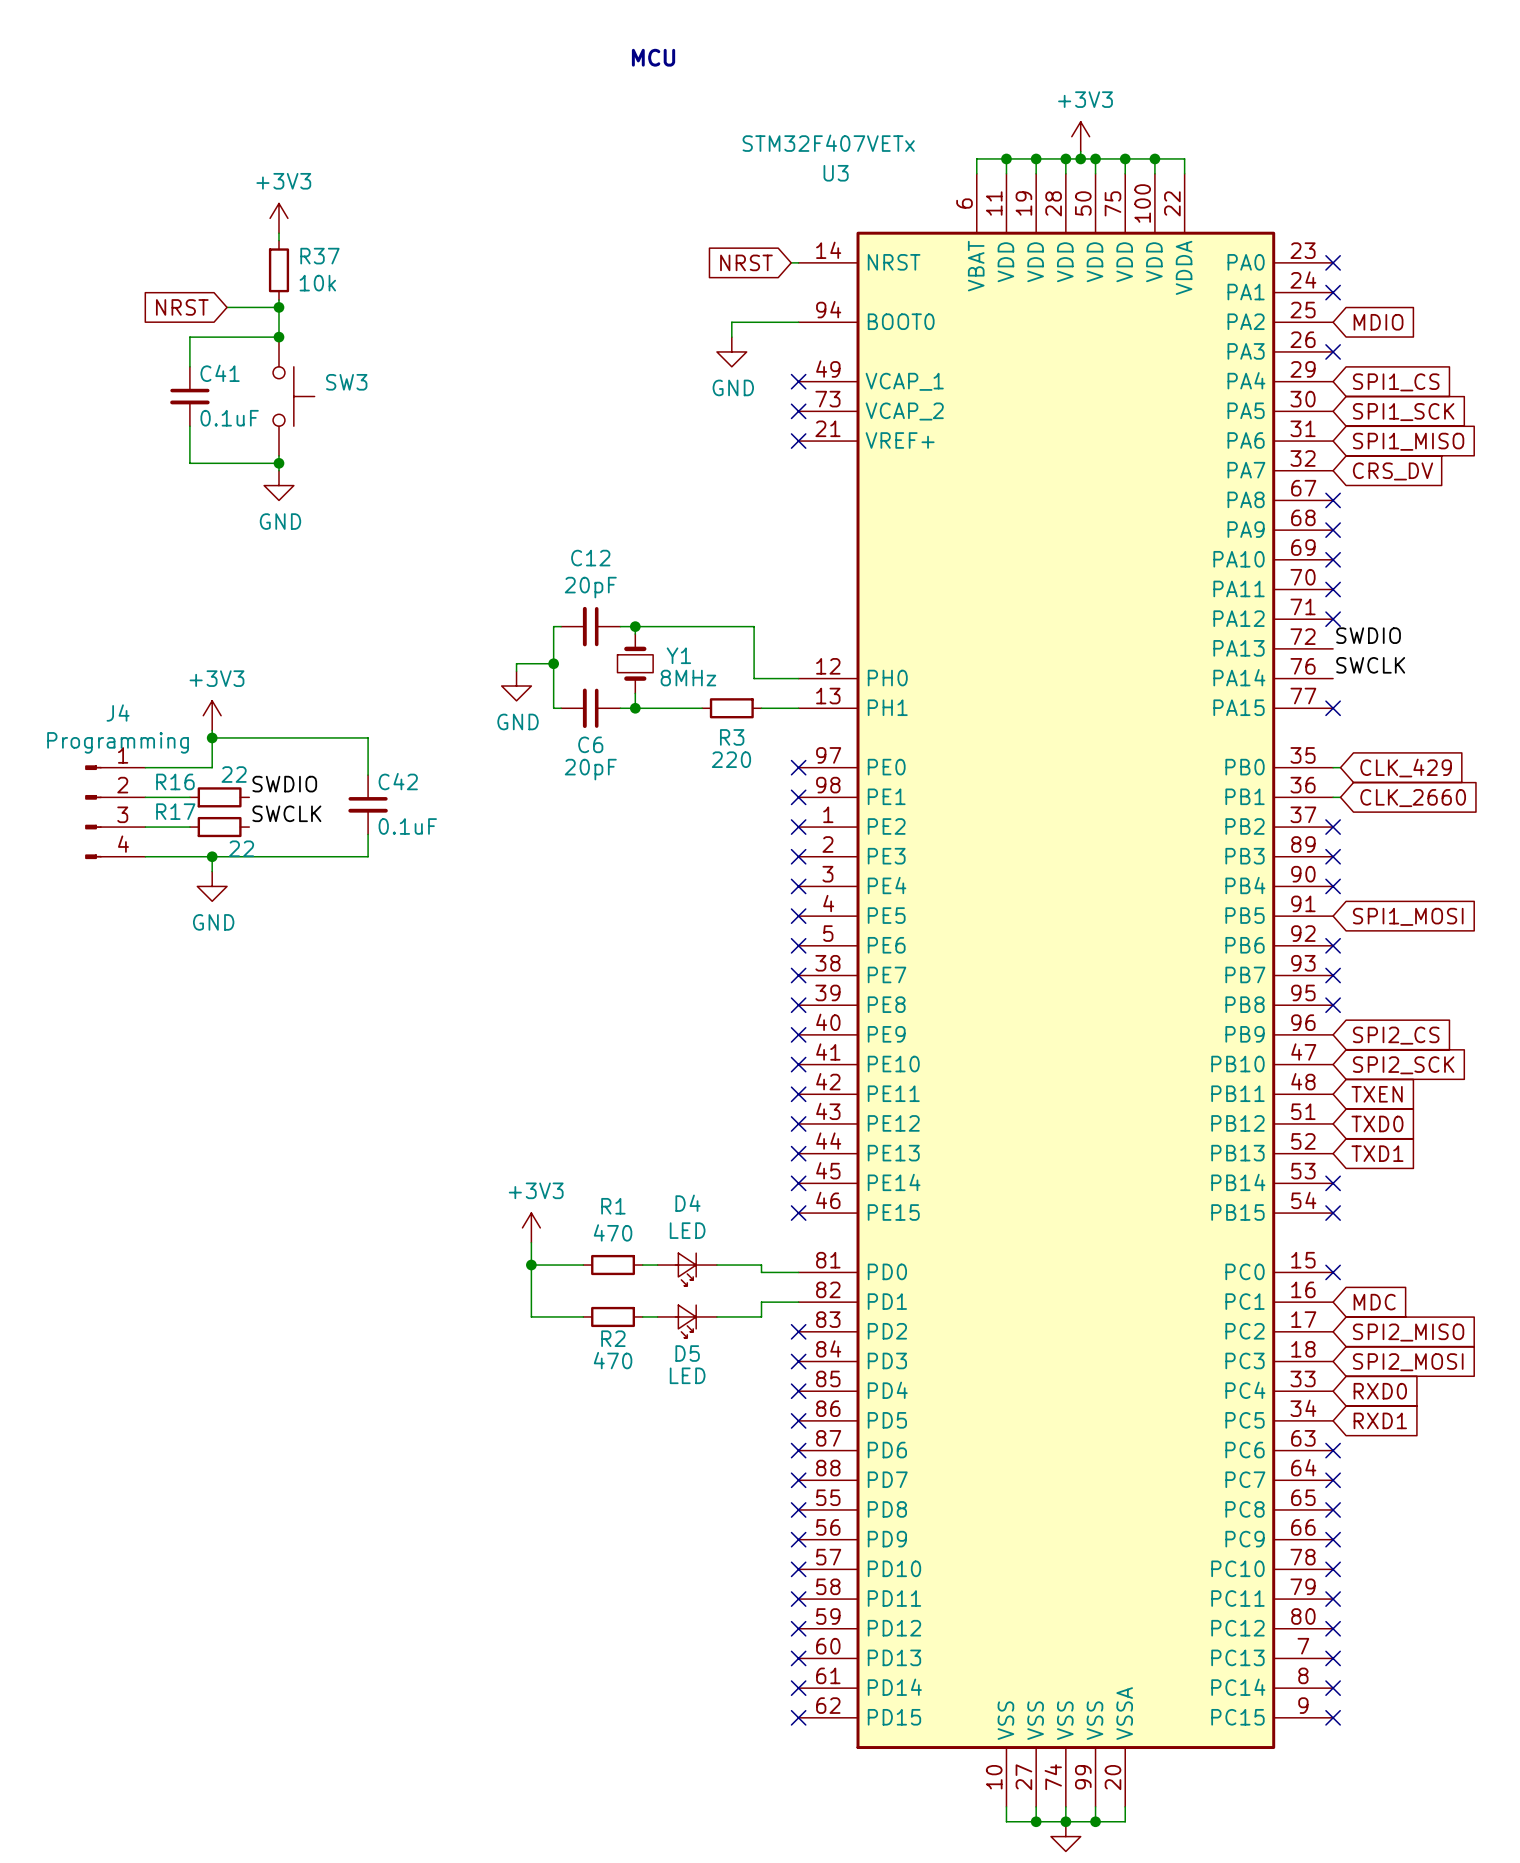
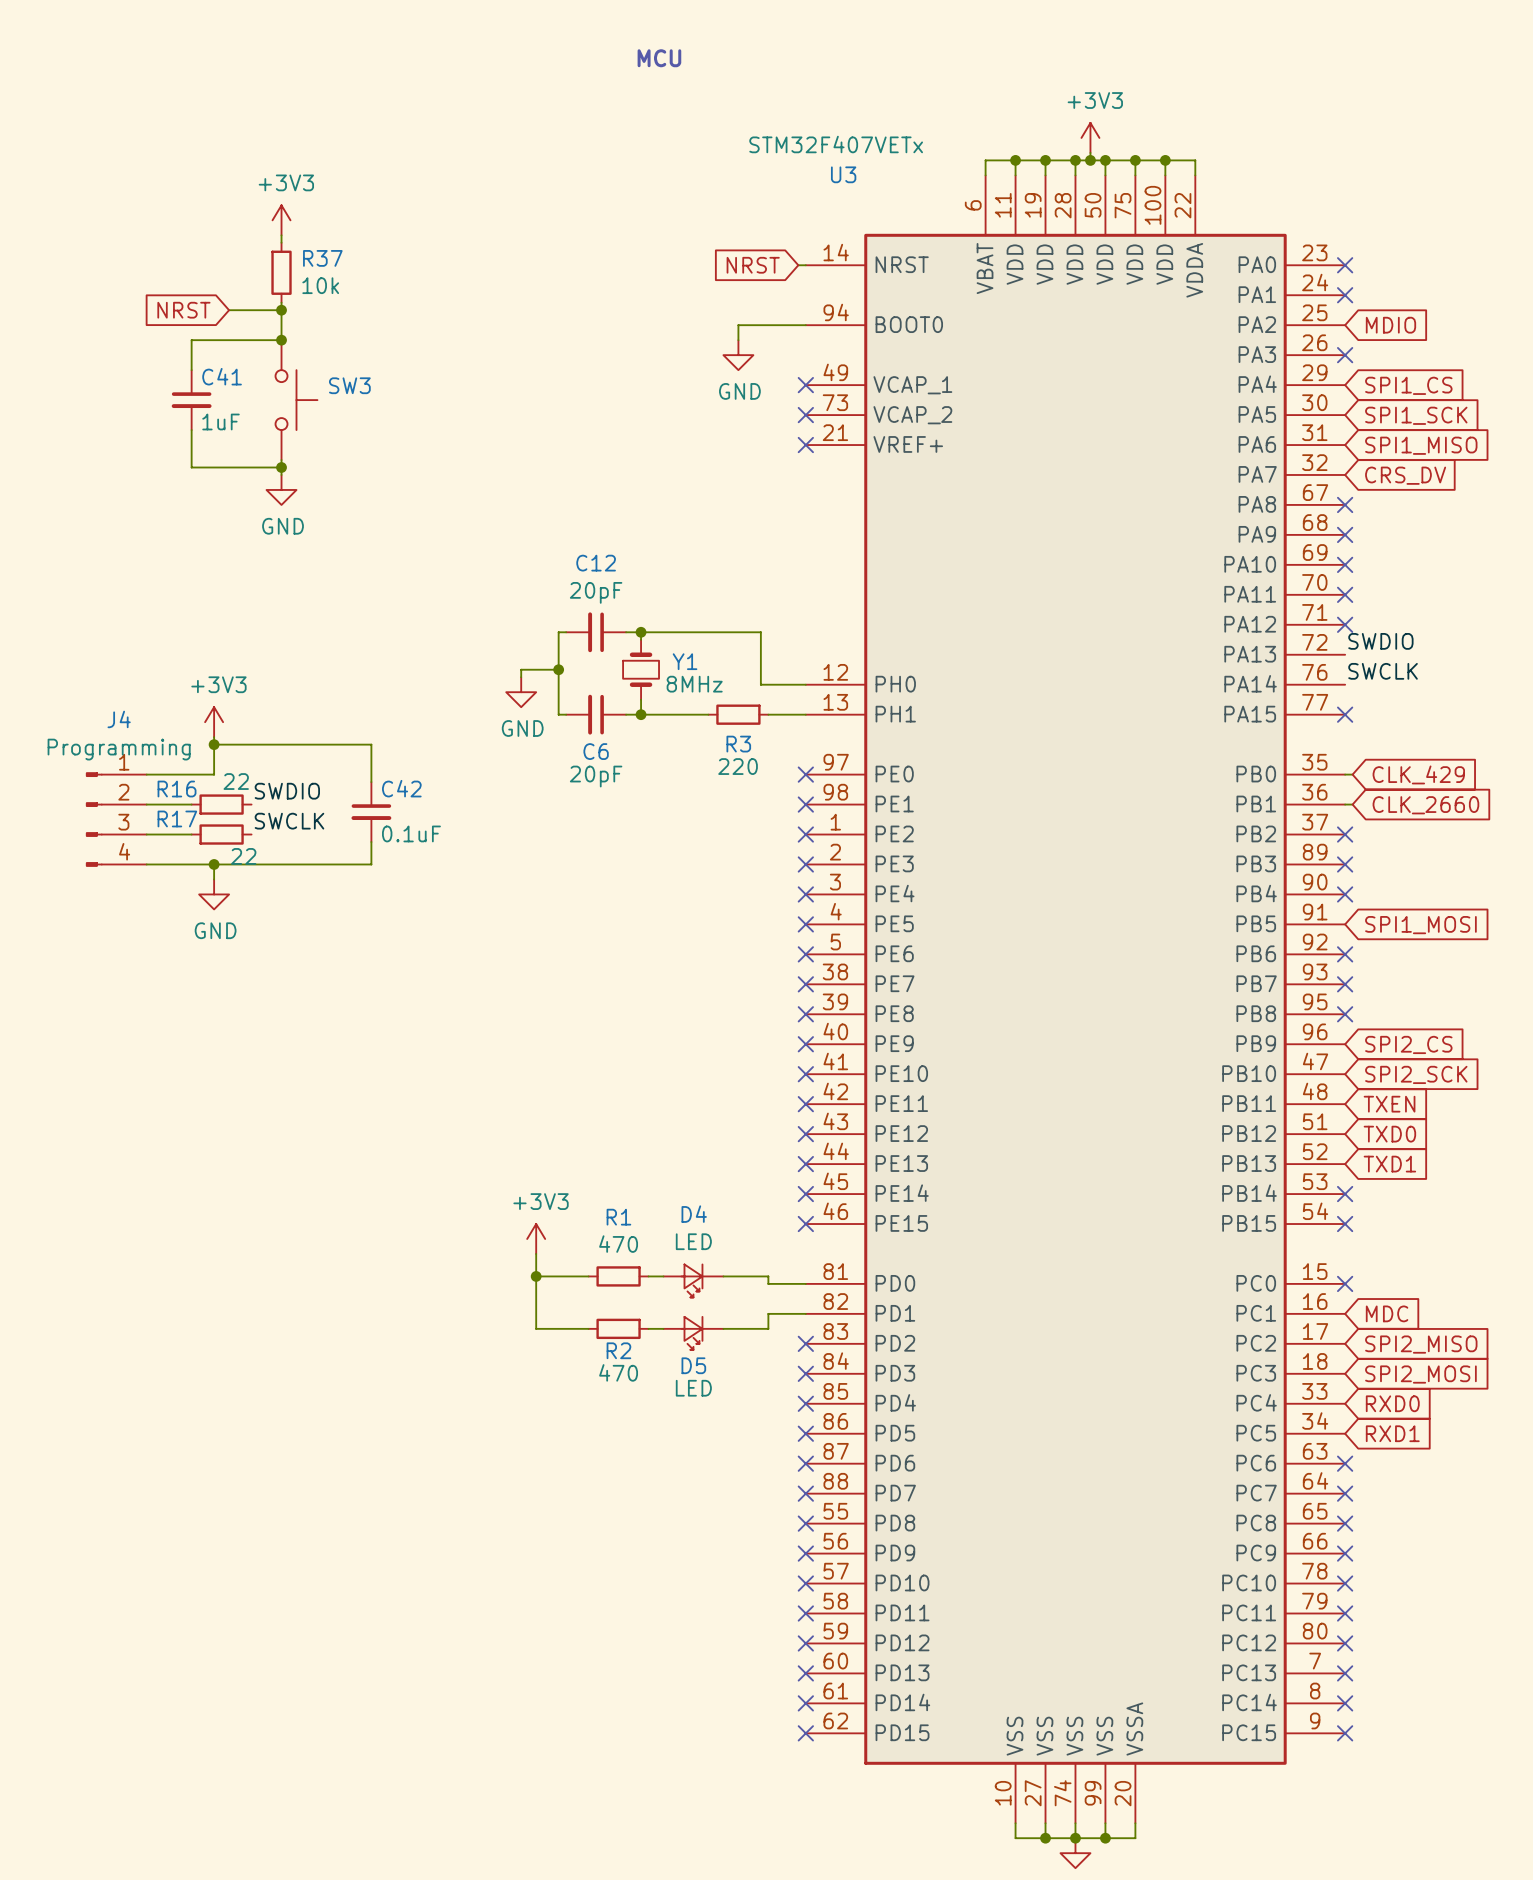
C41 value: 0.1uF (229, 418) -> 1uF (220, 421)

